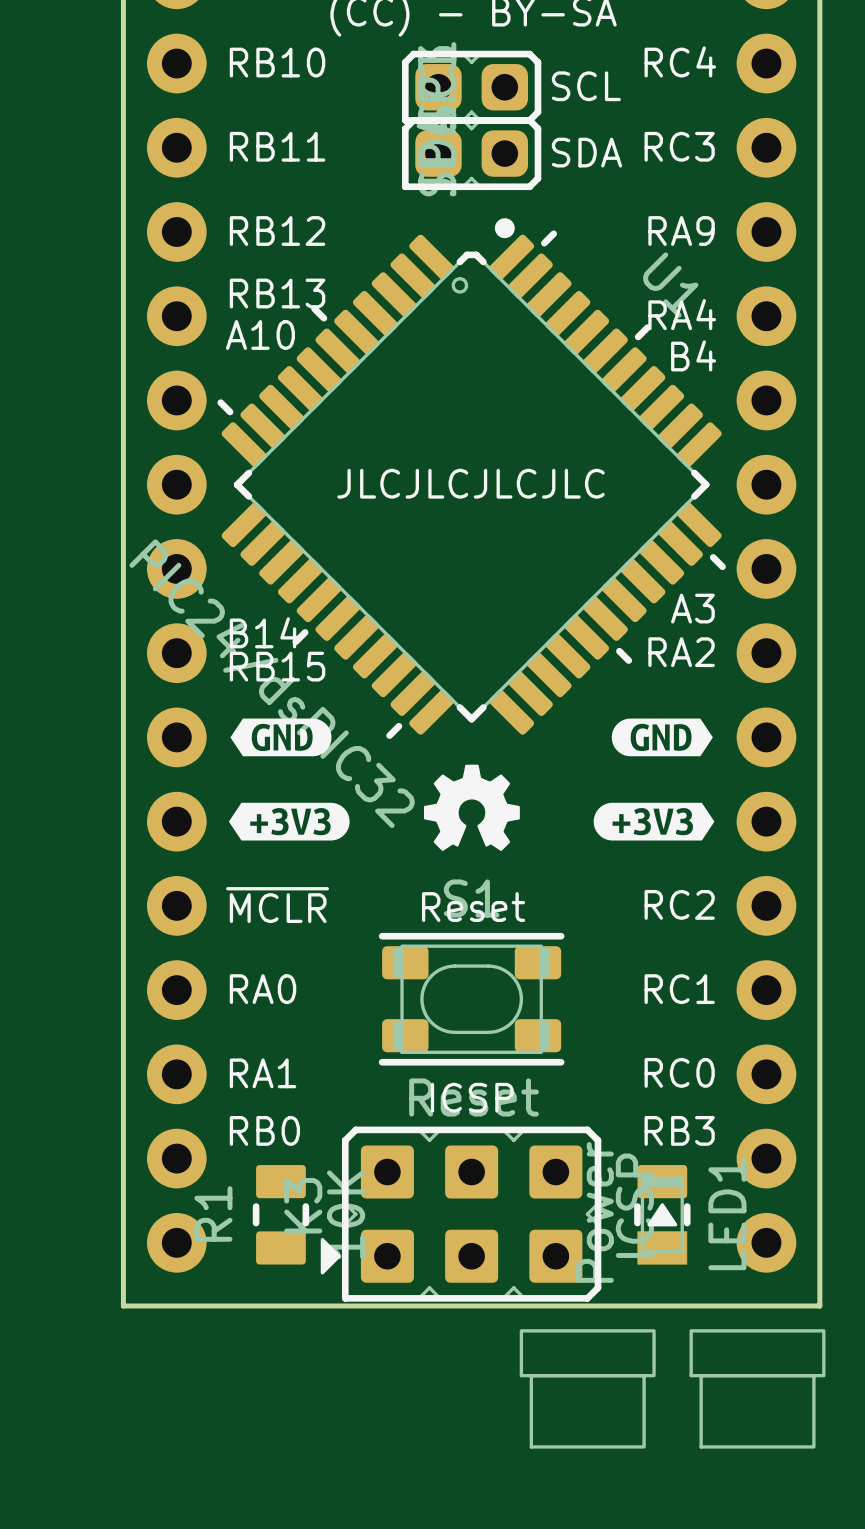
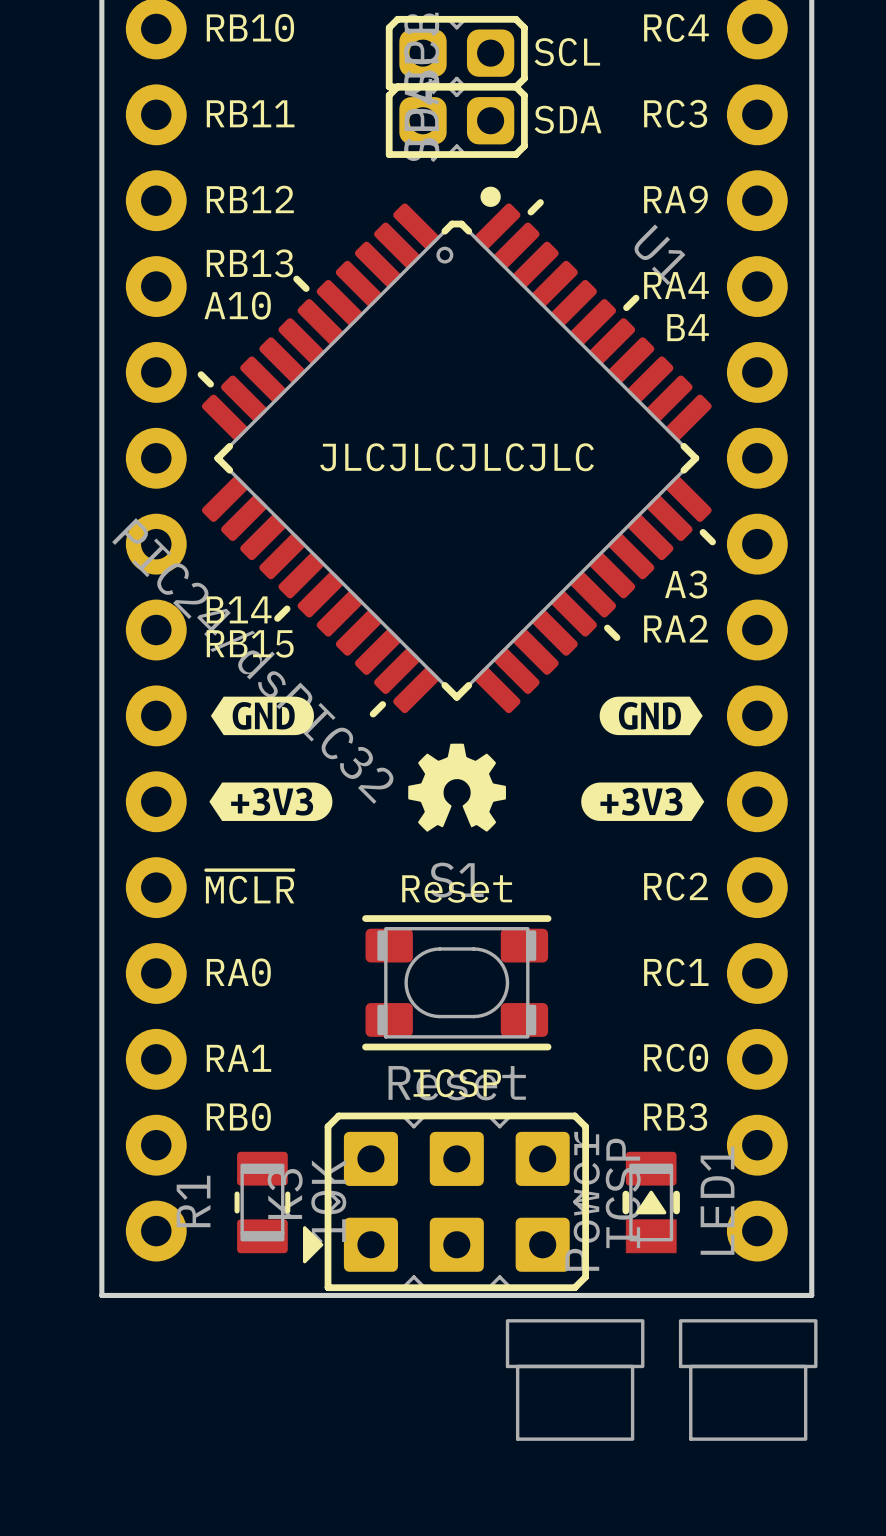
R1 footprint: [252, 1165, 310, 1265] -> [234, 1151, 291, 1254]

